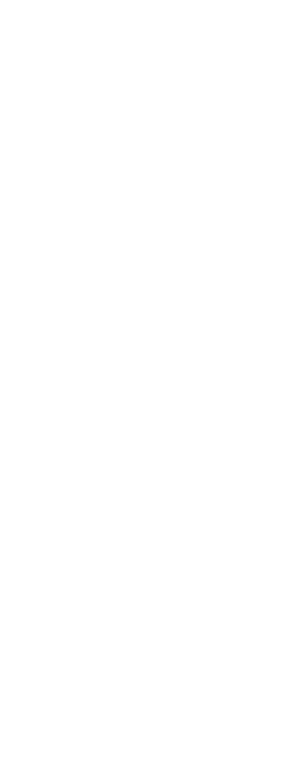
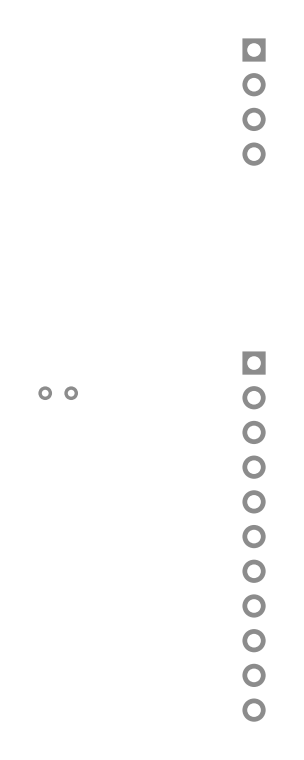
part: none -> (254, 102)
part: none -> (58, 393)
part: none -> (254, 536)

